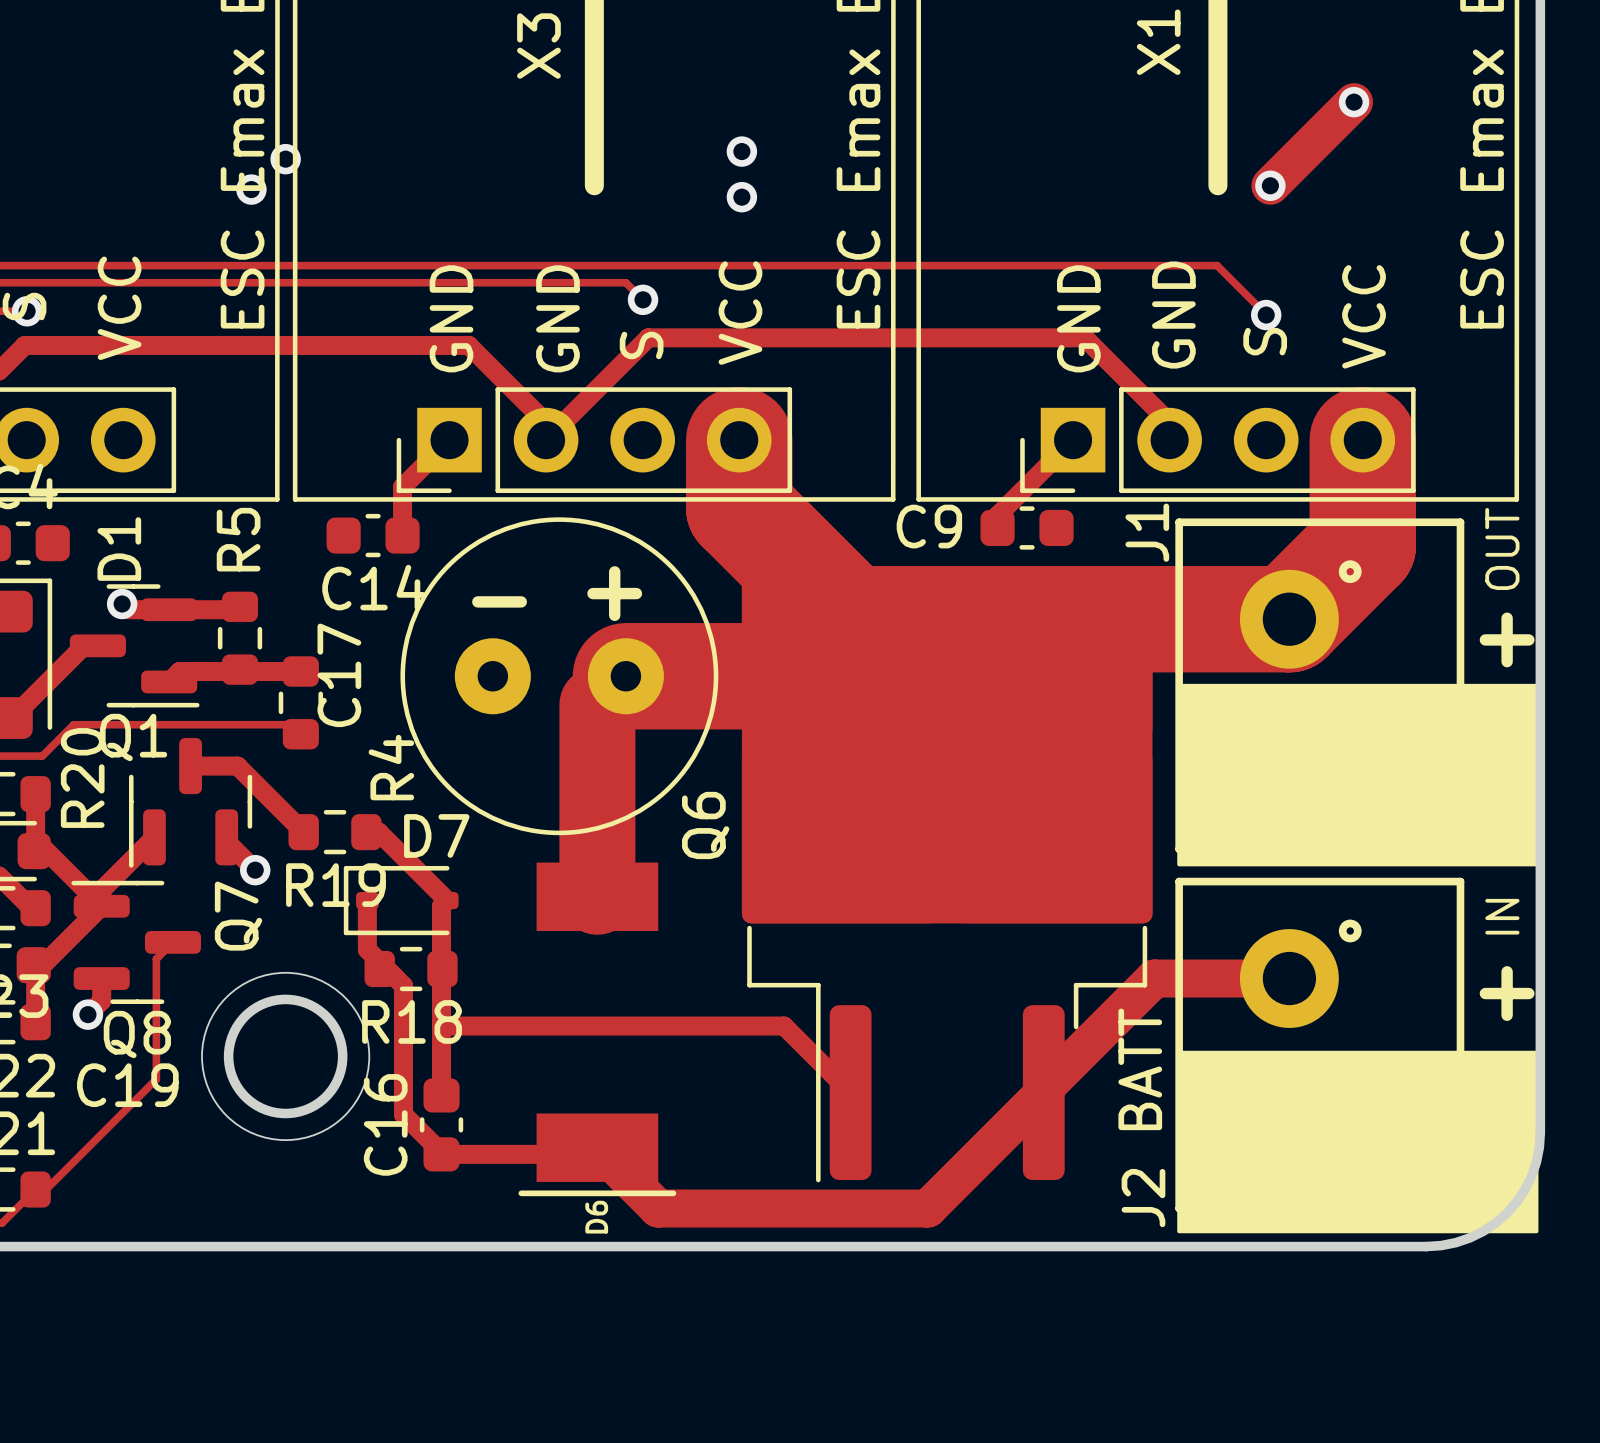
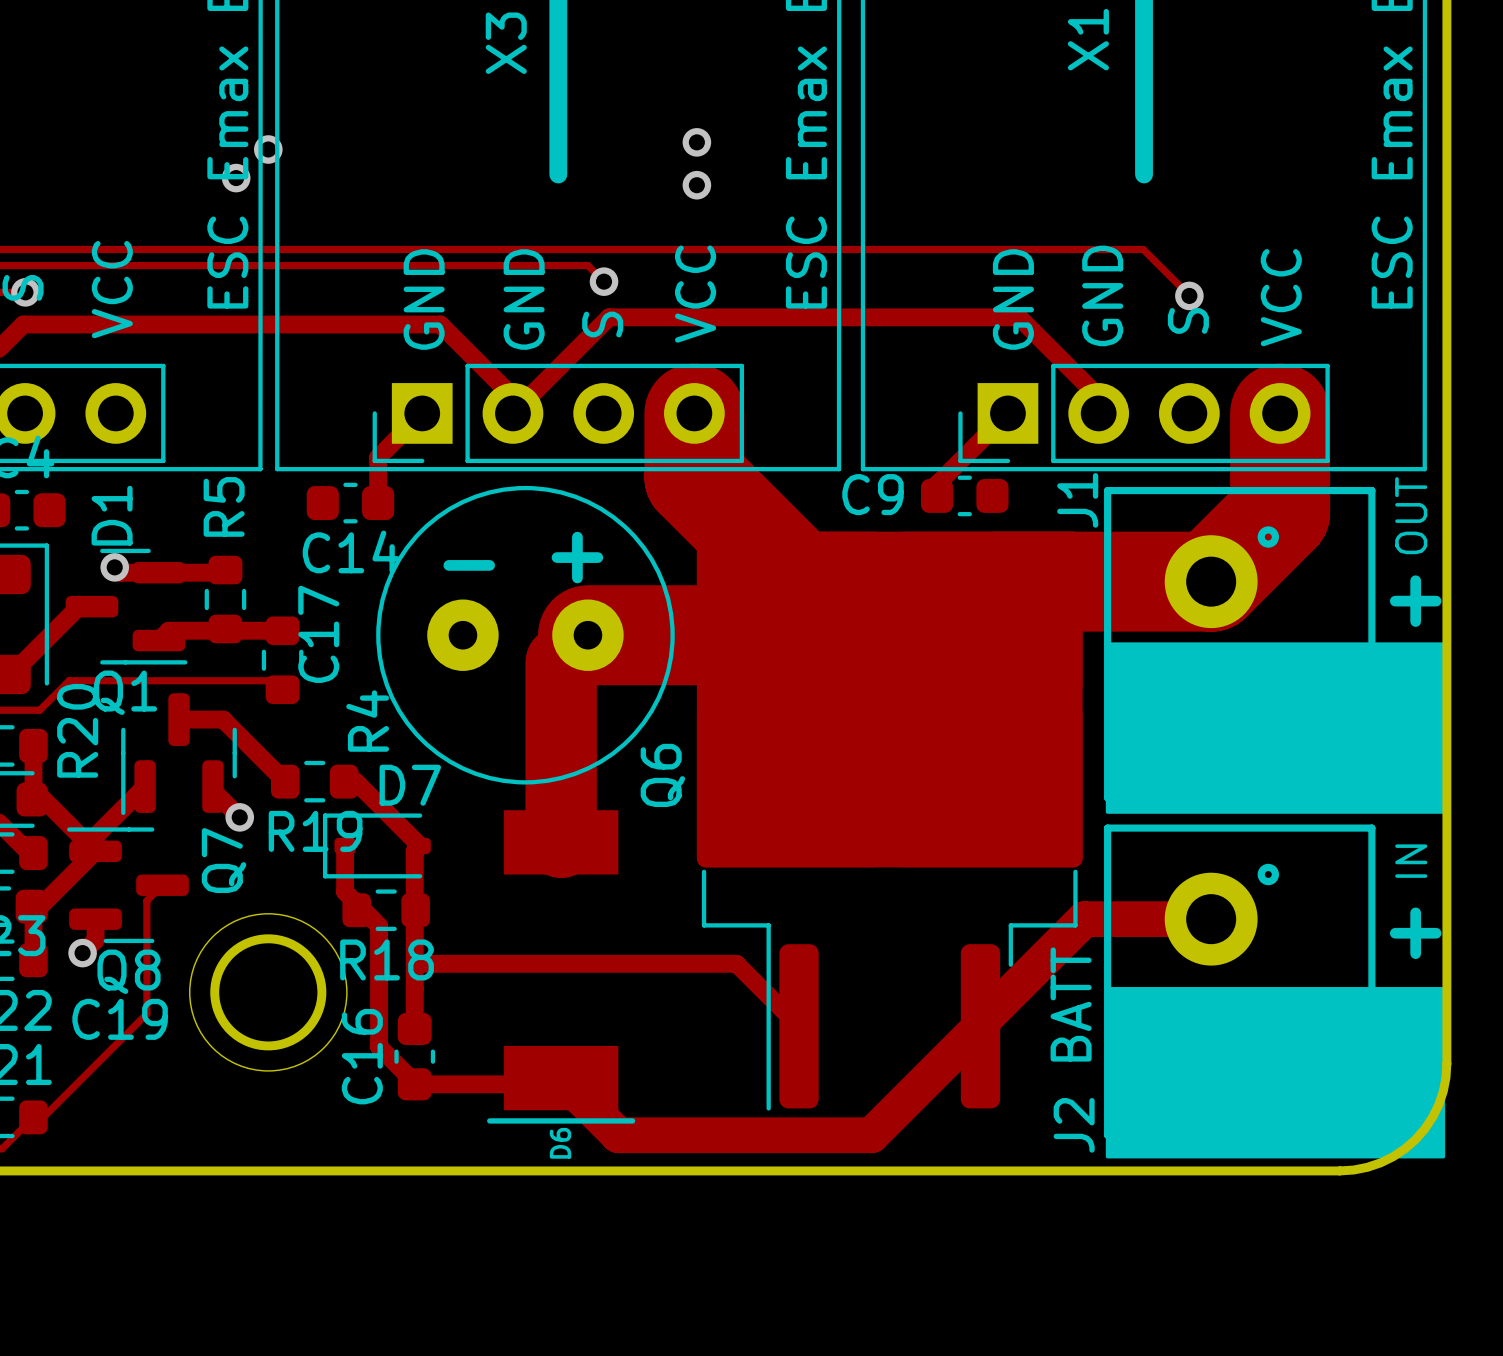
track: (1354, 102) (1270, 185) -> none
via: (1354, 102) -> none
via: (1270, 185) -> none

